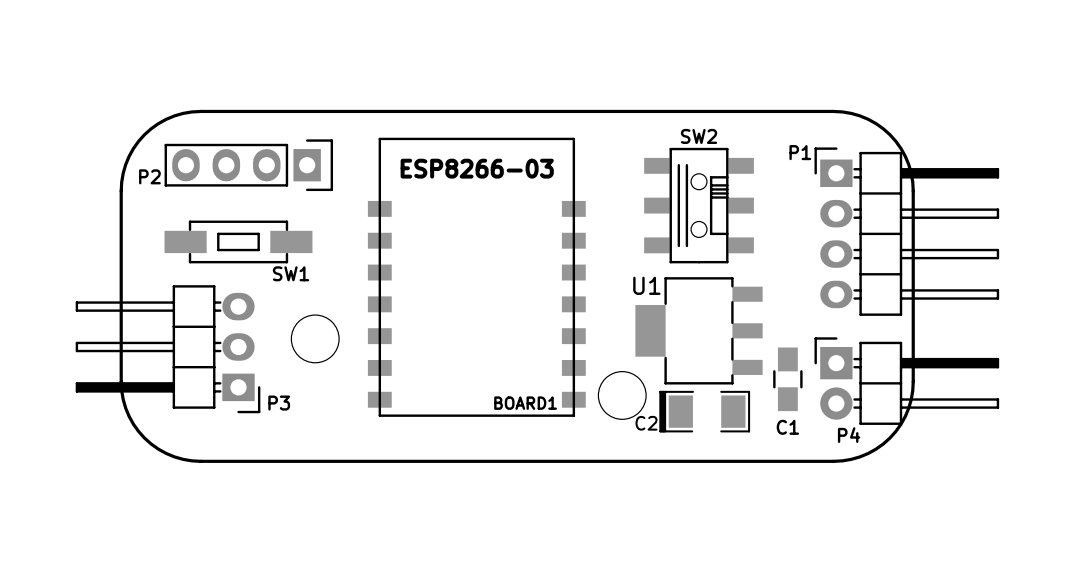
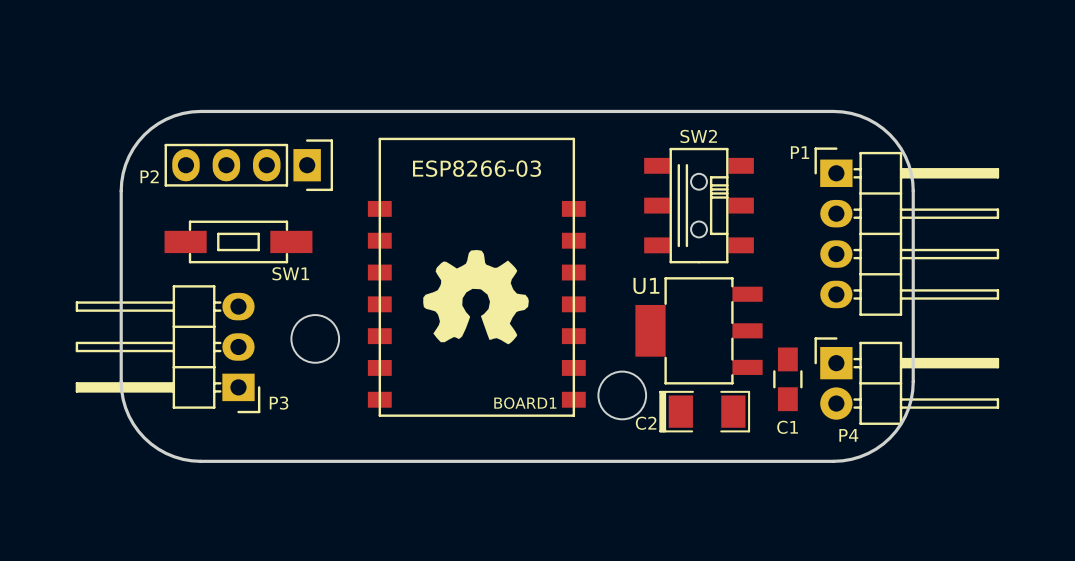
drawing: none -> [423, 250, 529, 345]

